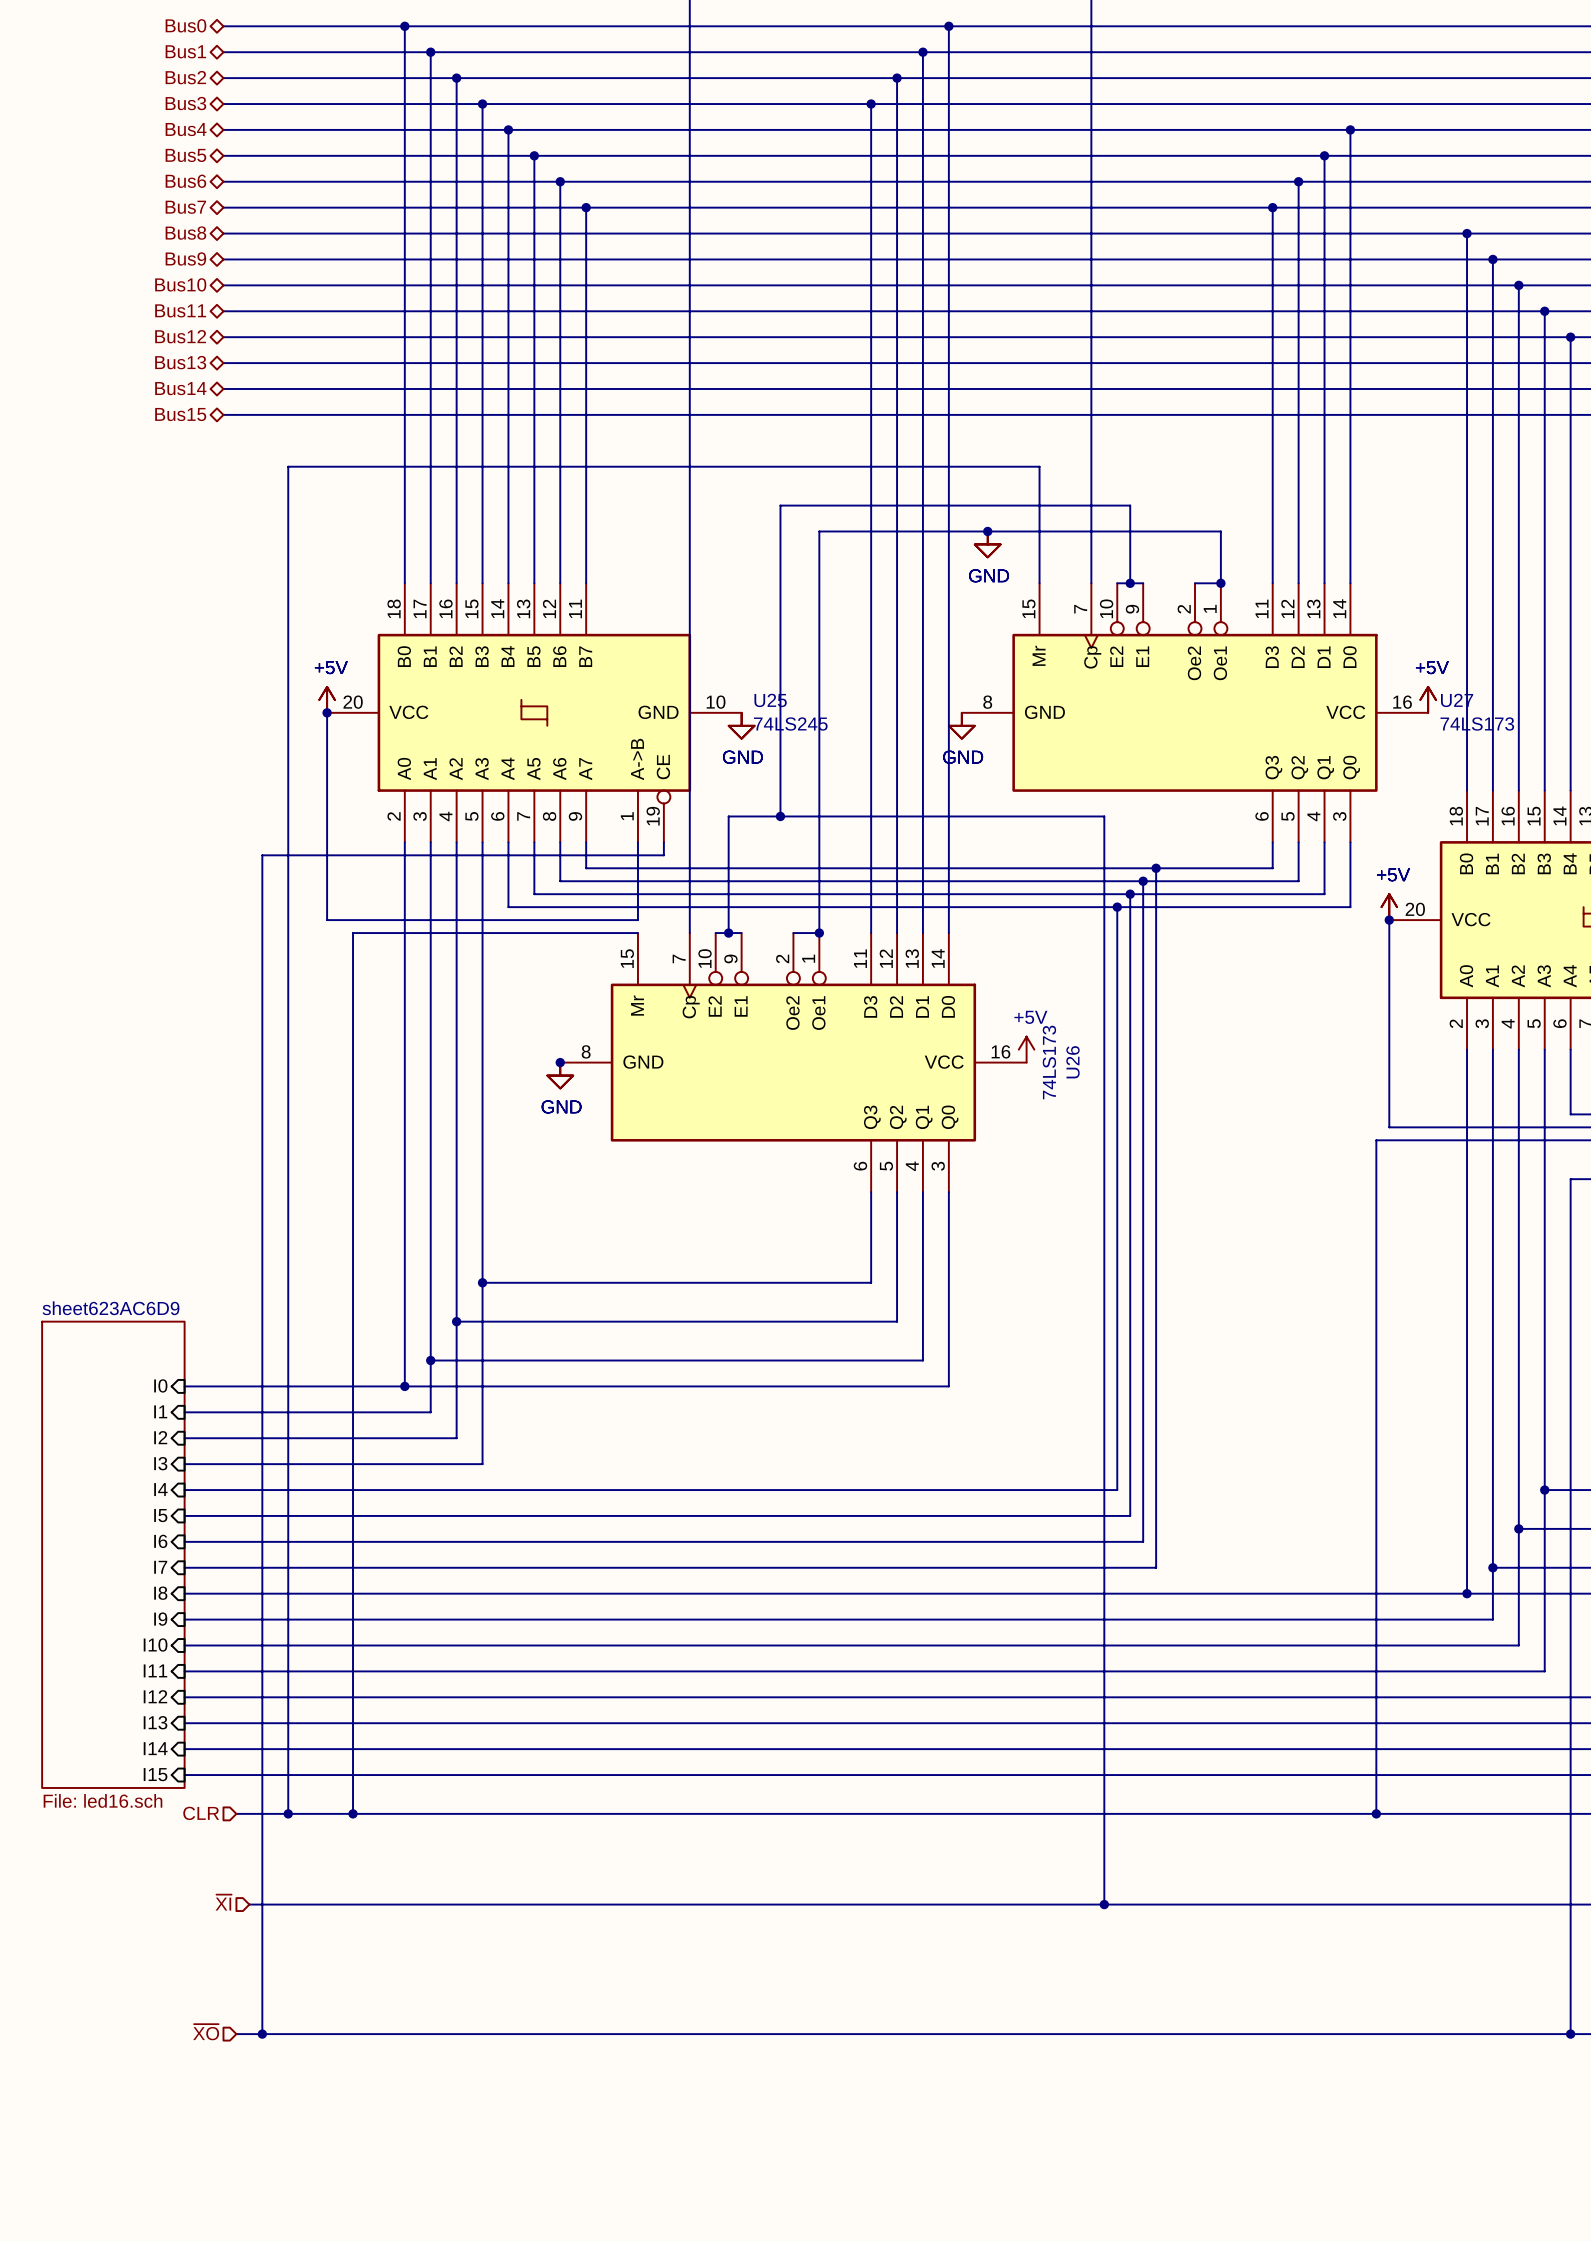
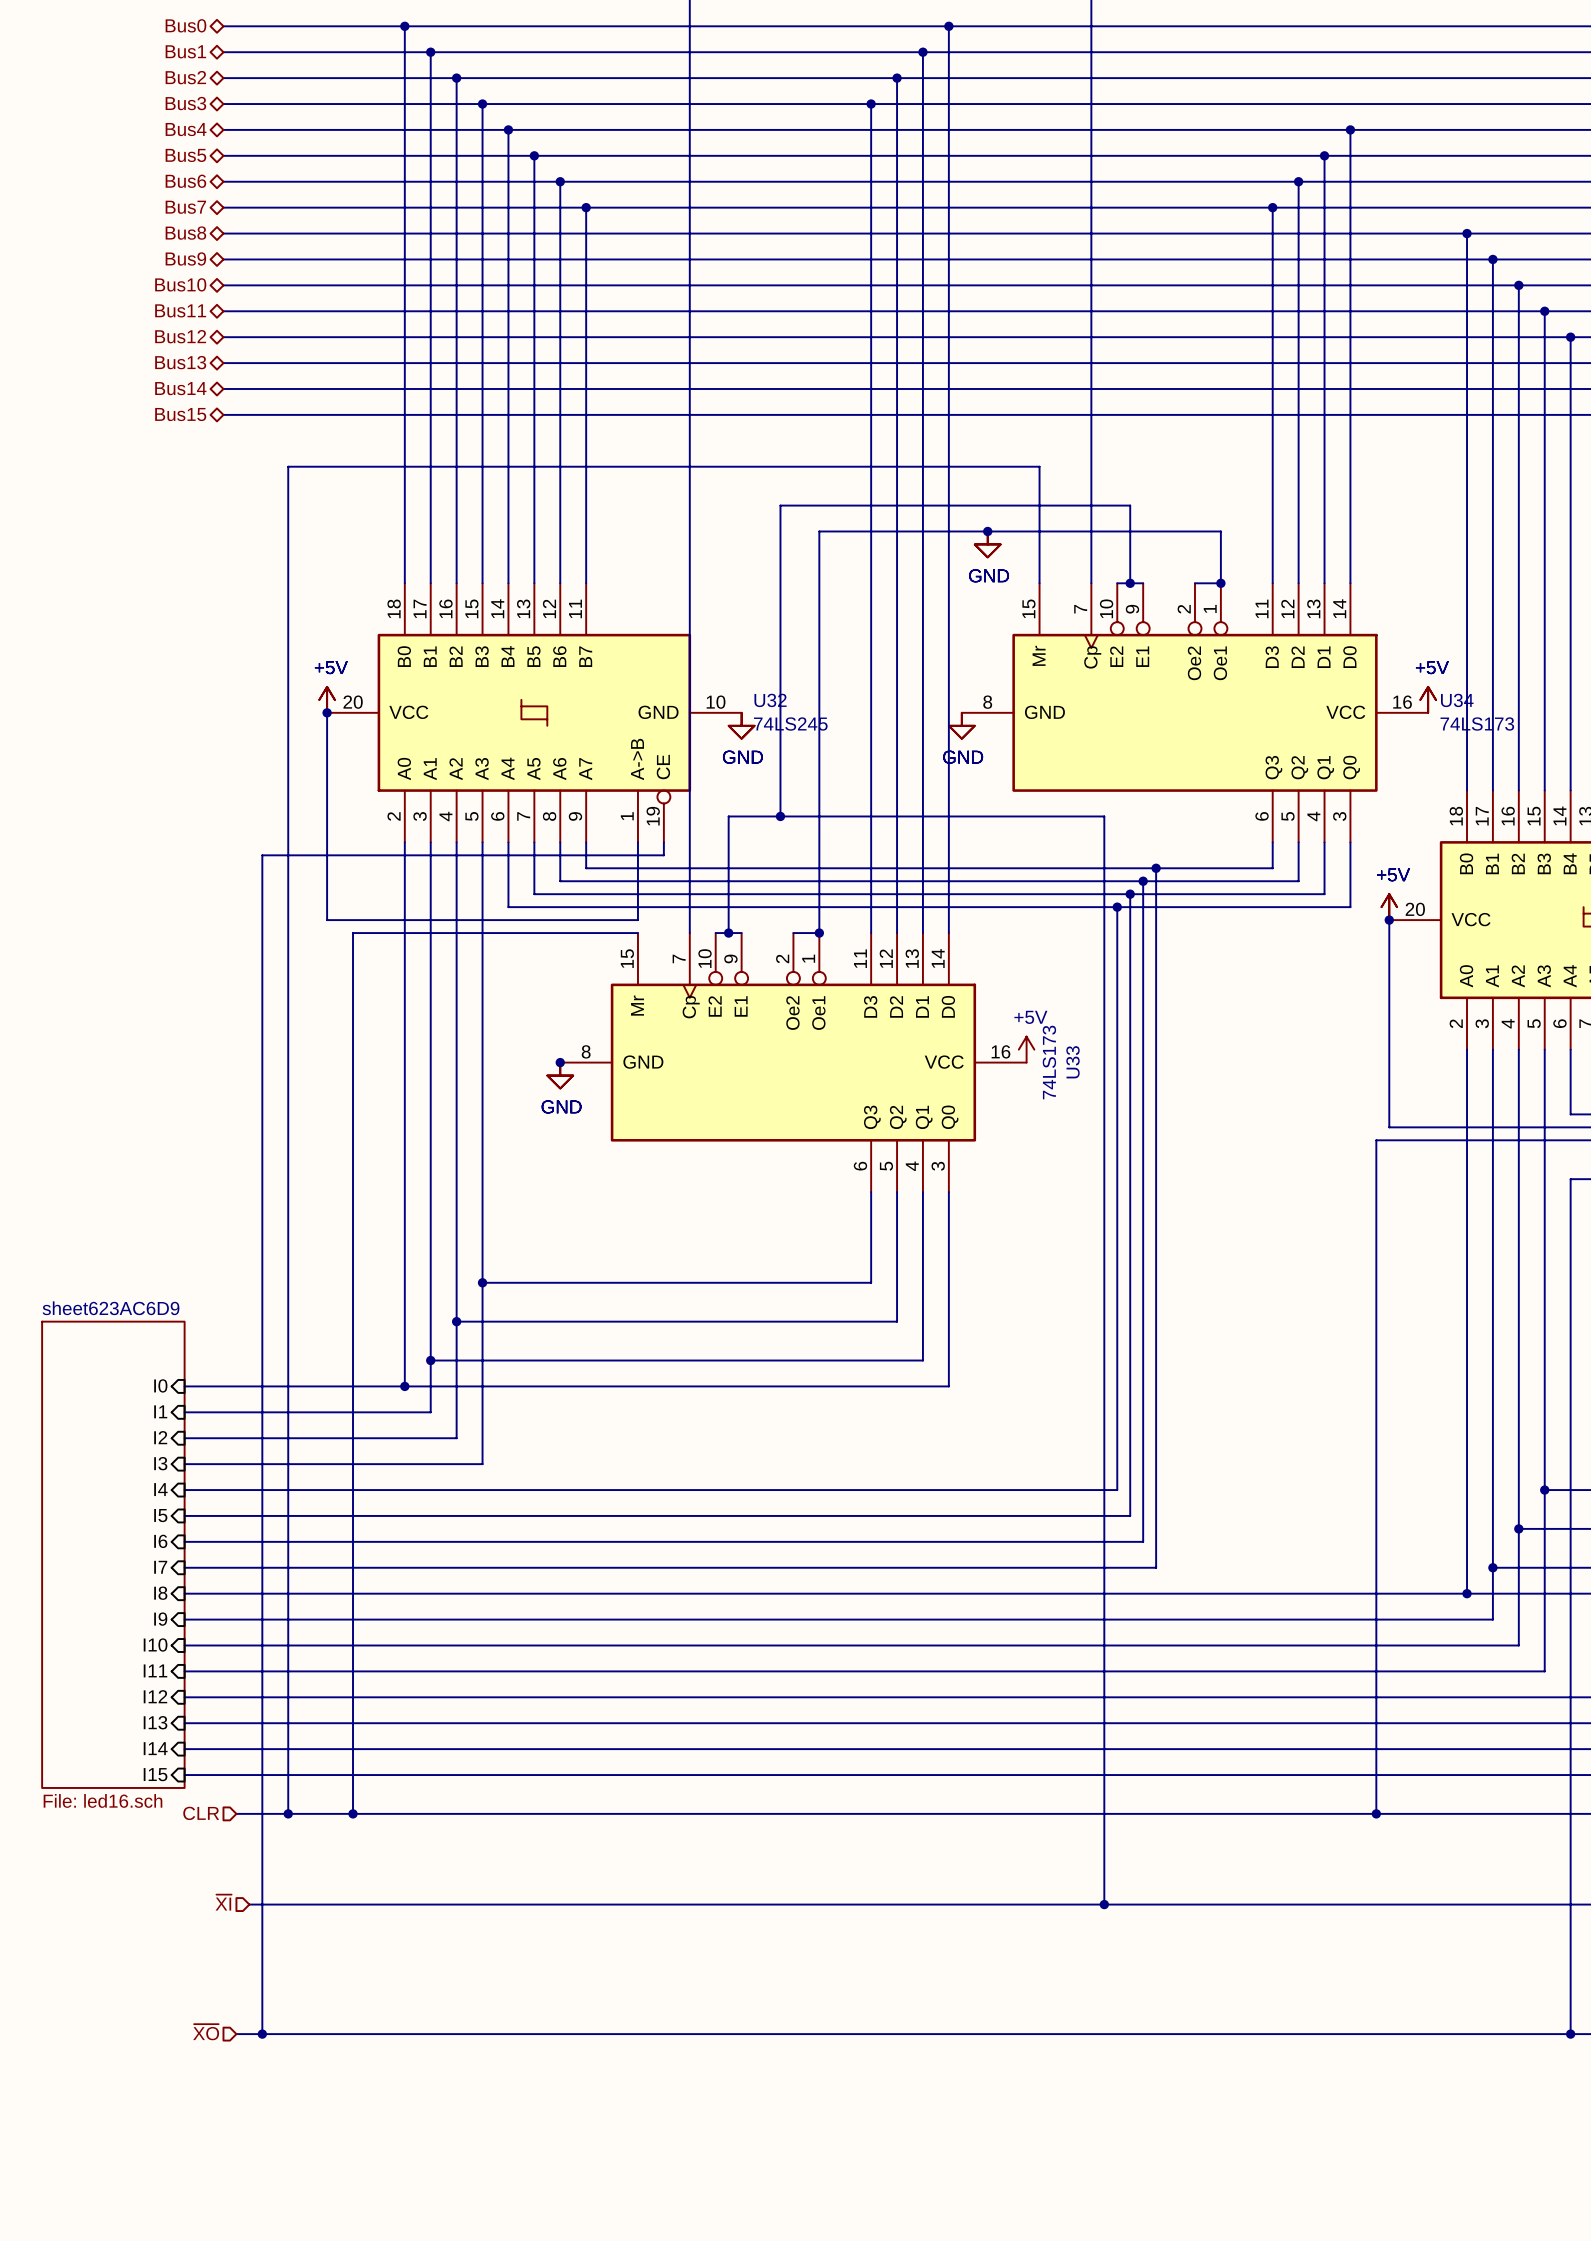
U25 name: U25 (770, 700) -> U32 (770, 700)
U27 name: U27 (1457, 700) -> U34 (1457, 700)
U26 name: U26 (1072, 1062) -> U33 (1072, 1062)

